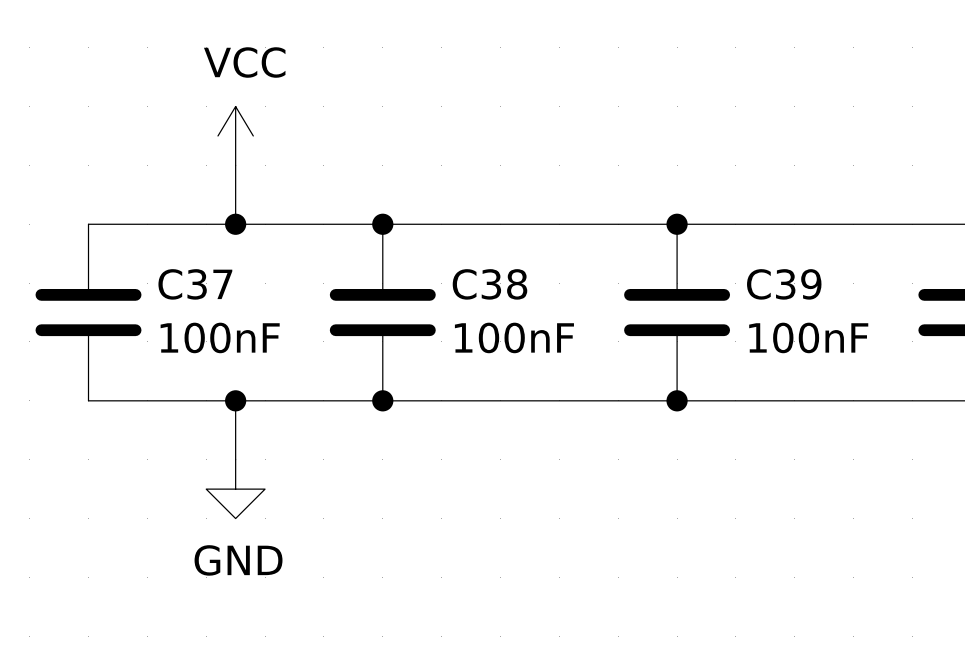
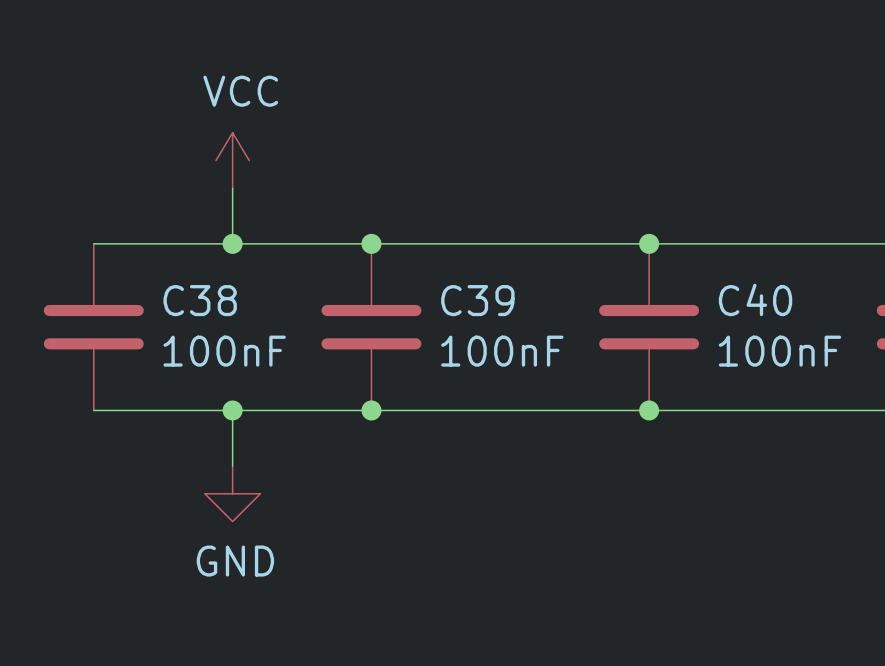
C37 name: C37 (195, 284) -> C38 (200, 300)
C38 name: C38 (490, 284) -> C39 (477, 300)
C39 name: C39 (784, 284) -> C40 (755, 299)

